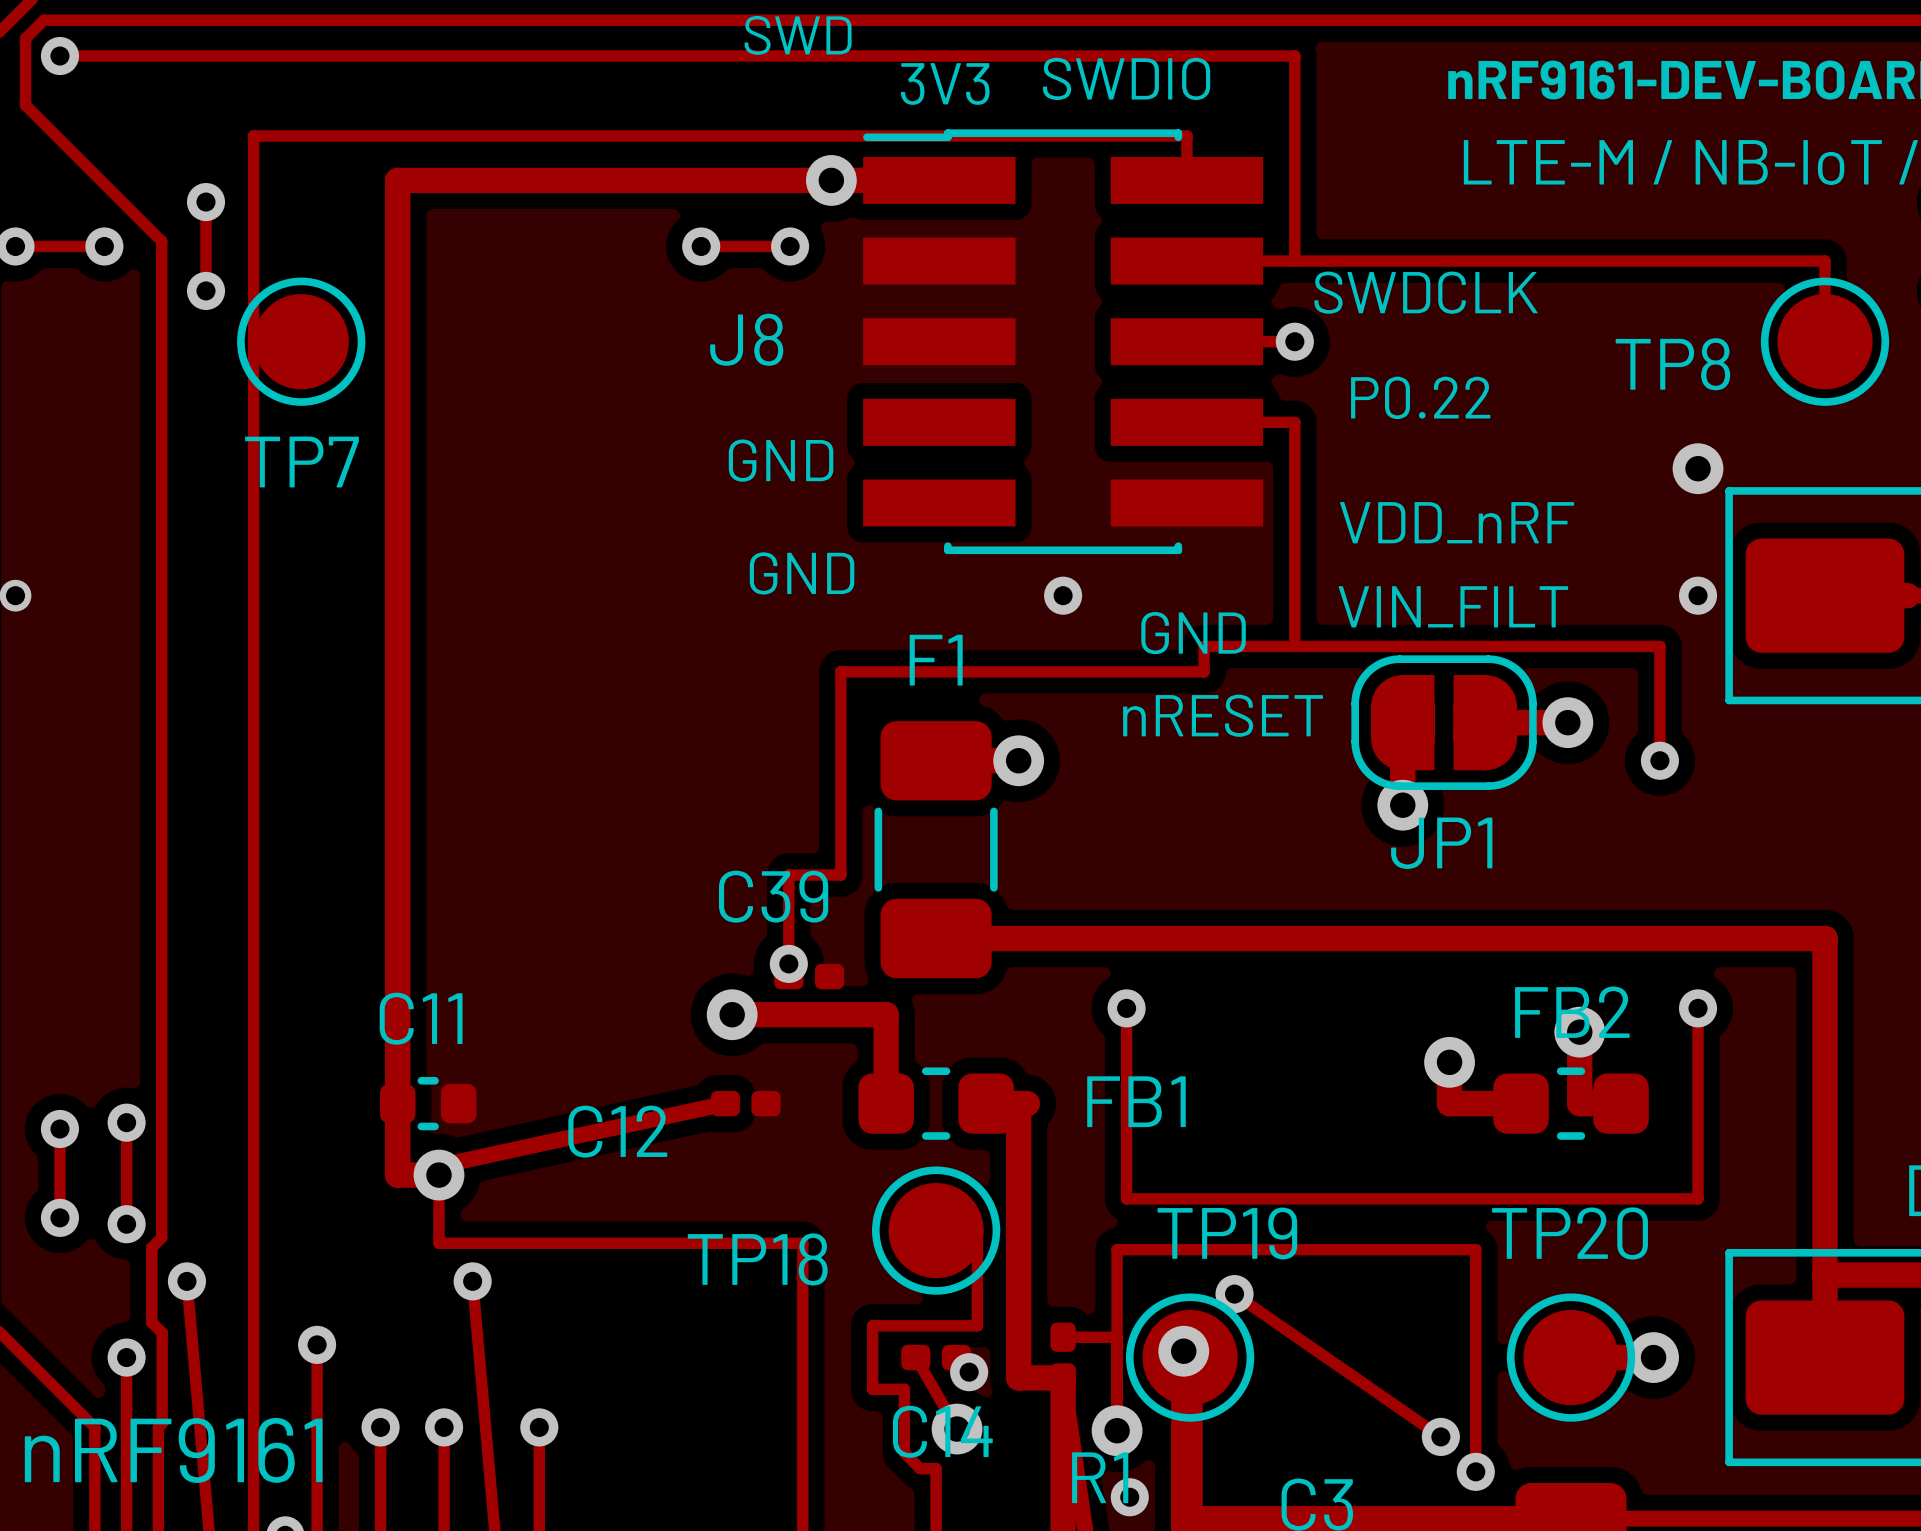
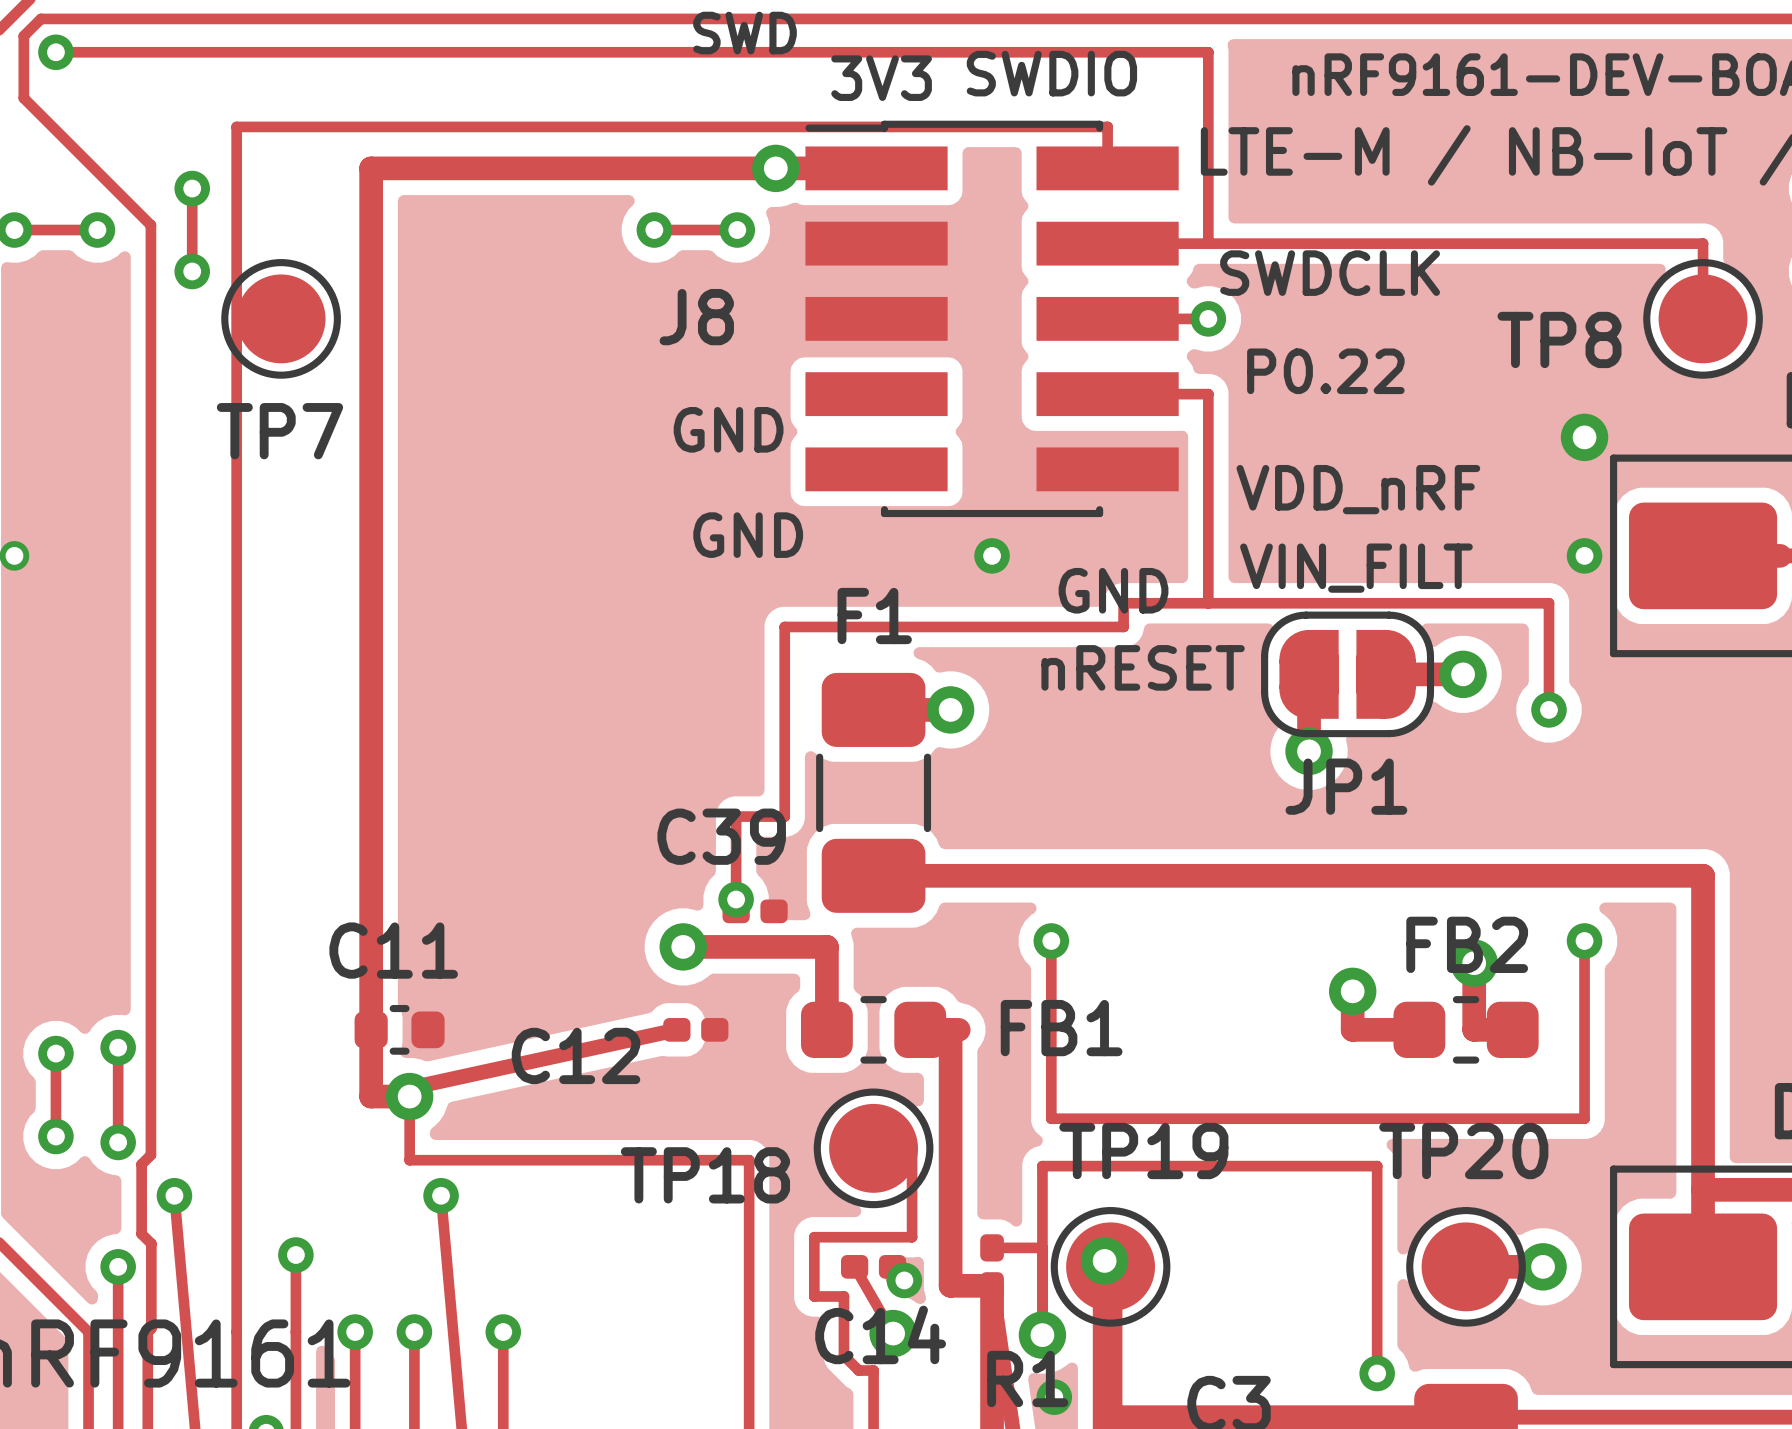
track: (1234, 1294) (1440, 1436) -> none
via: (1234, 1294) -> none
via: (1440, 1436) -> none

